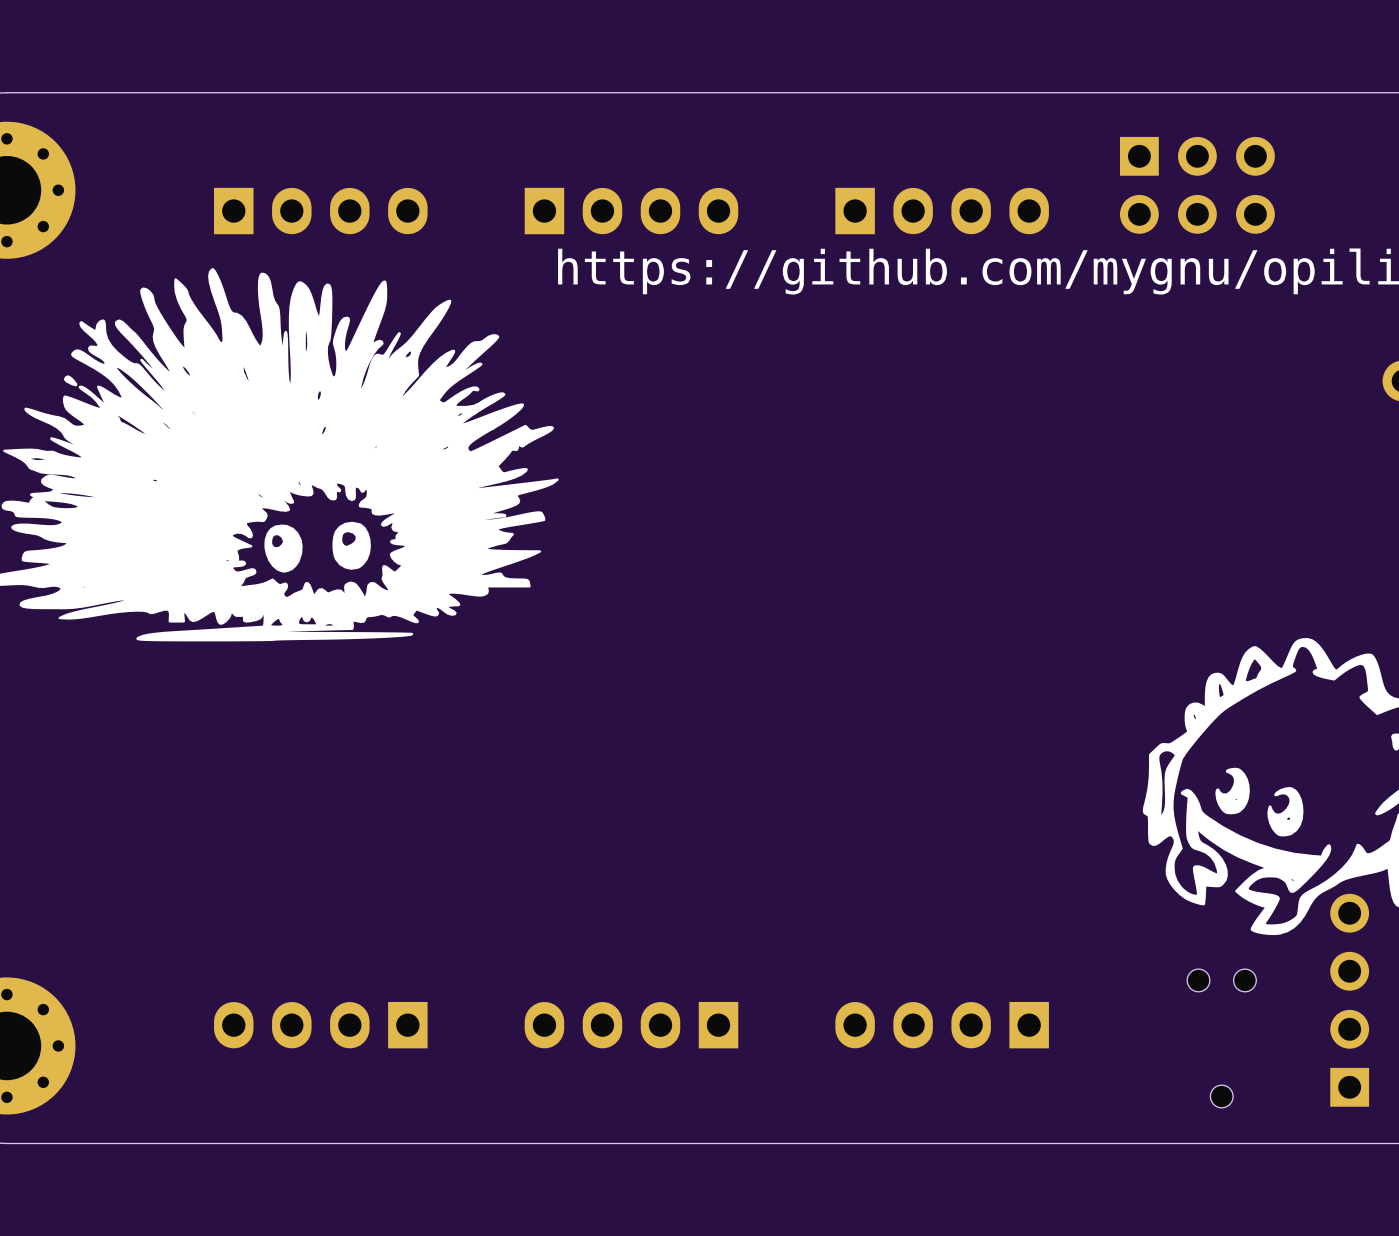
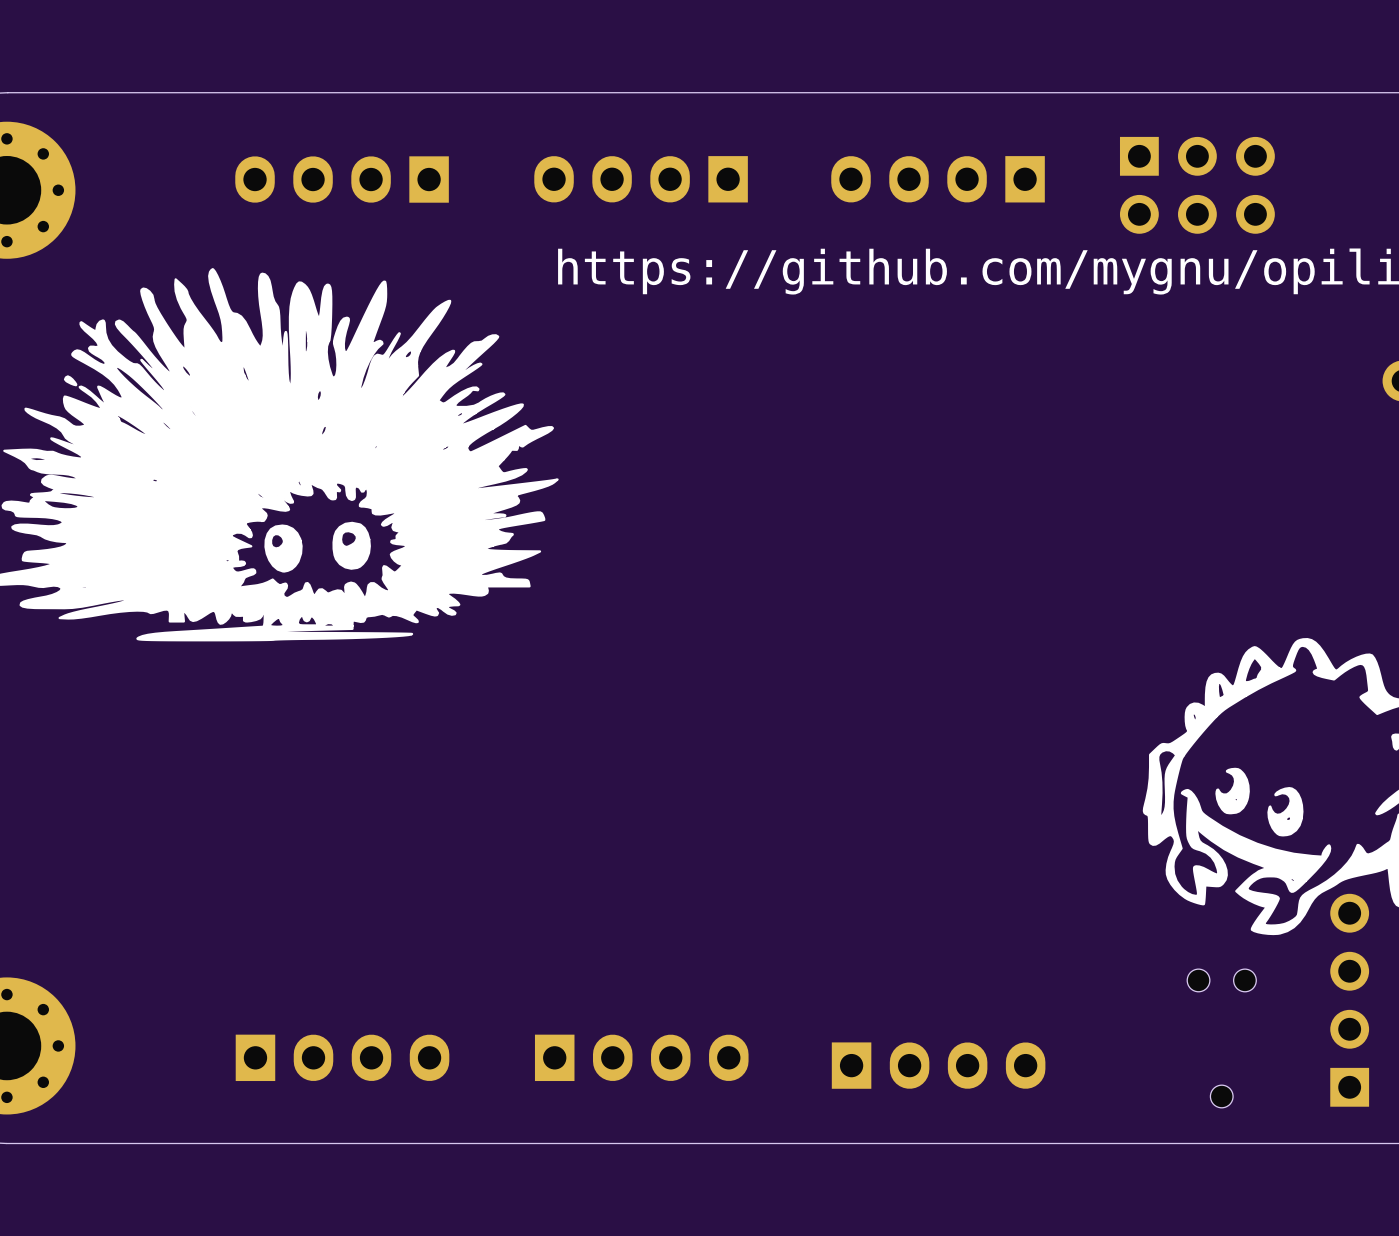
part rotation: 0° (320, 211) -> 180° (342, 179)
part rotation: 0° (631, 211) -> 180° (641, 179)
part rotation: 0° (942, 211) -> 180° (938, 179)
part rotation: 0° (320, 1025) -> 180° (342, 1057)
part rotation: 0° (631, 1025) -> 180° (641, 1057)
part rotation: 0° (942, 1025) -> 180° (938, 1065)

